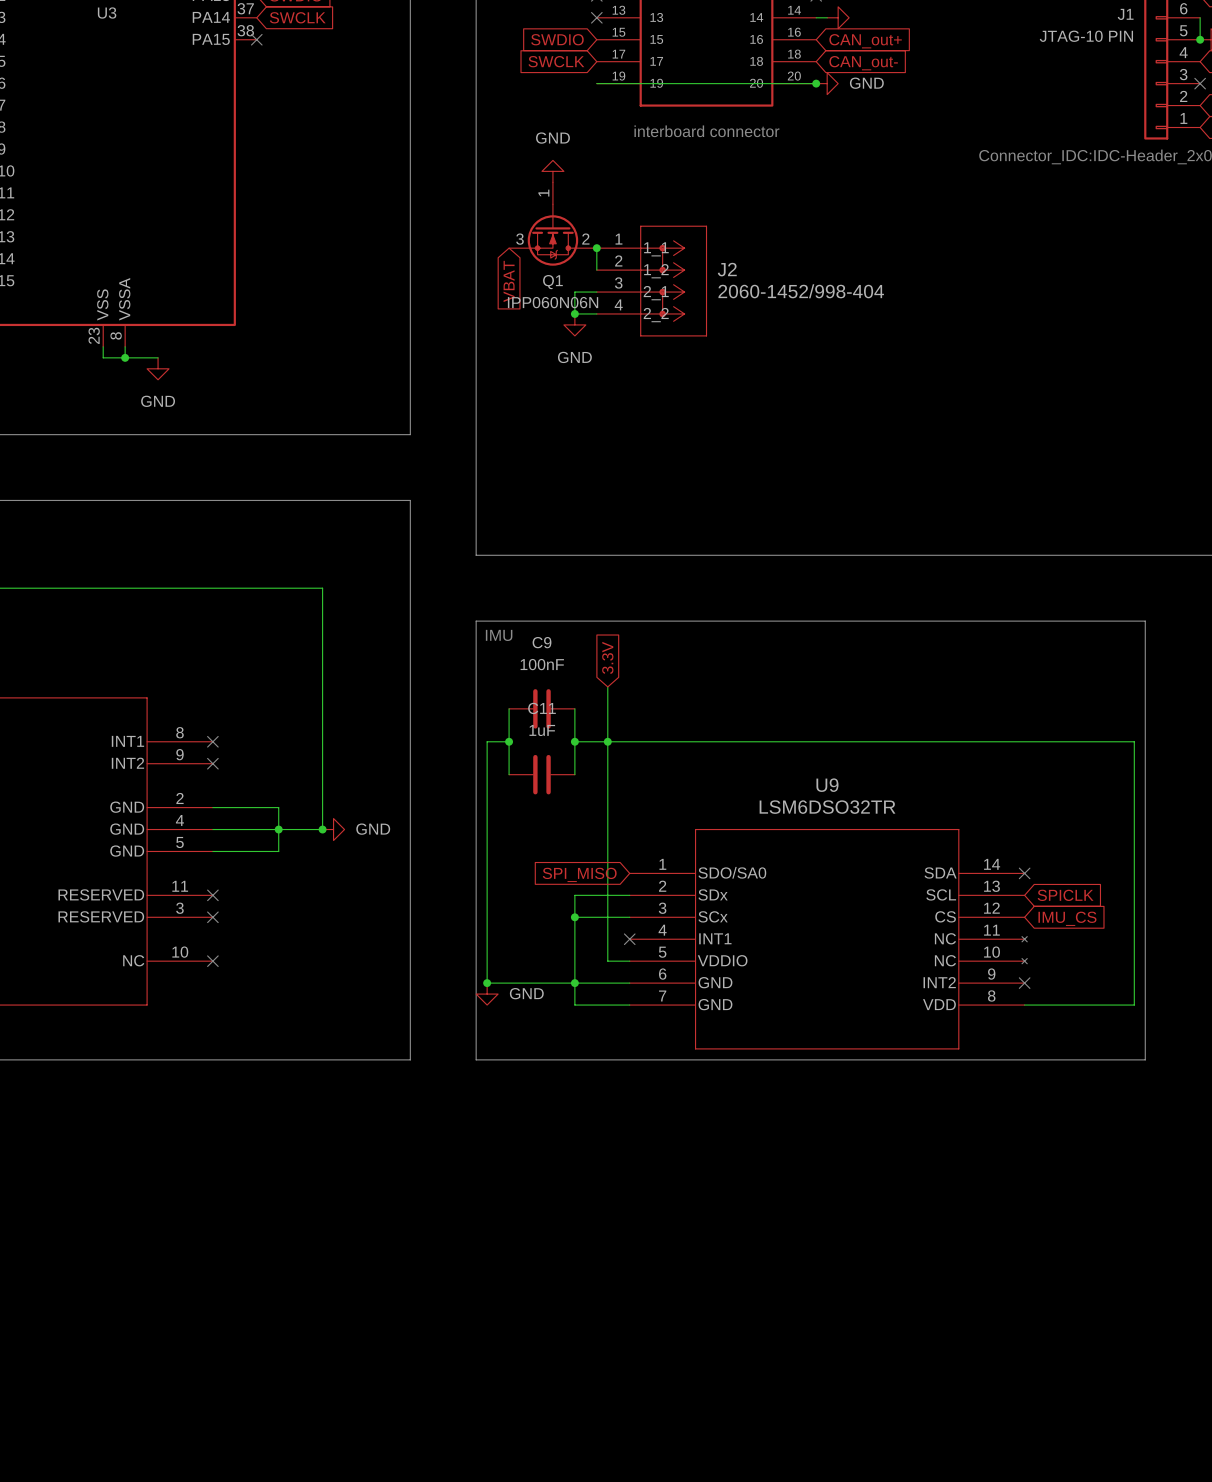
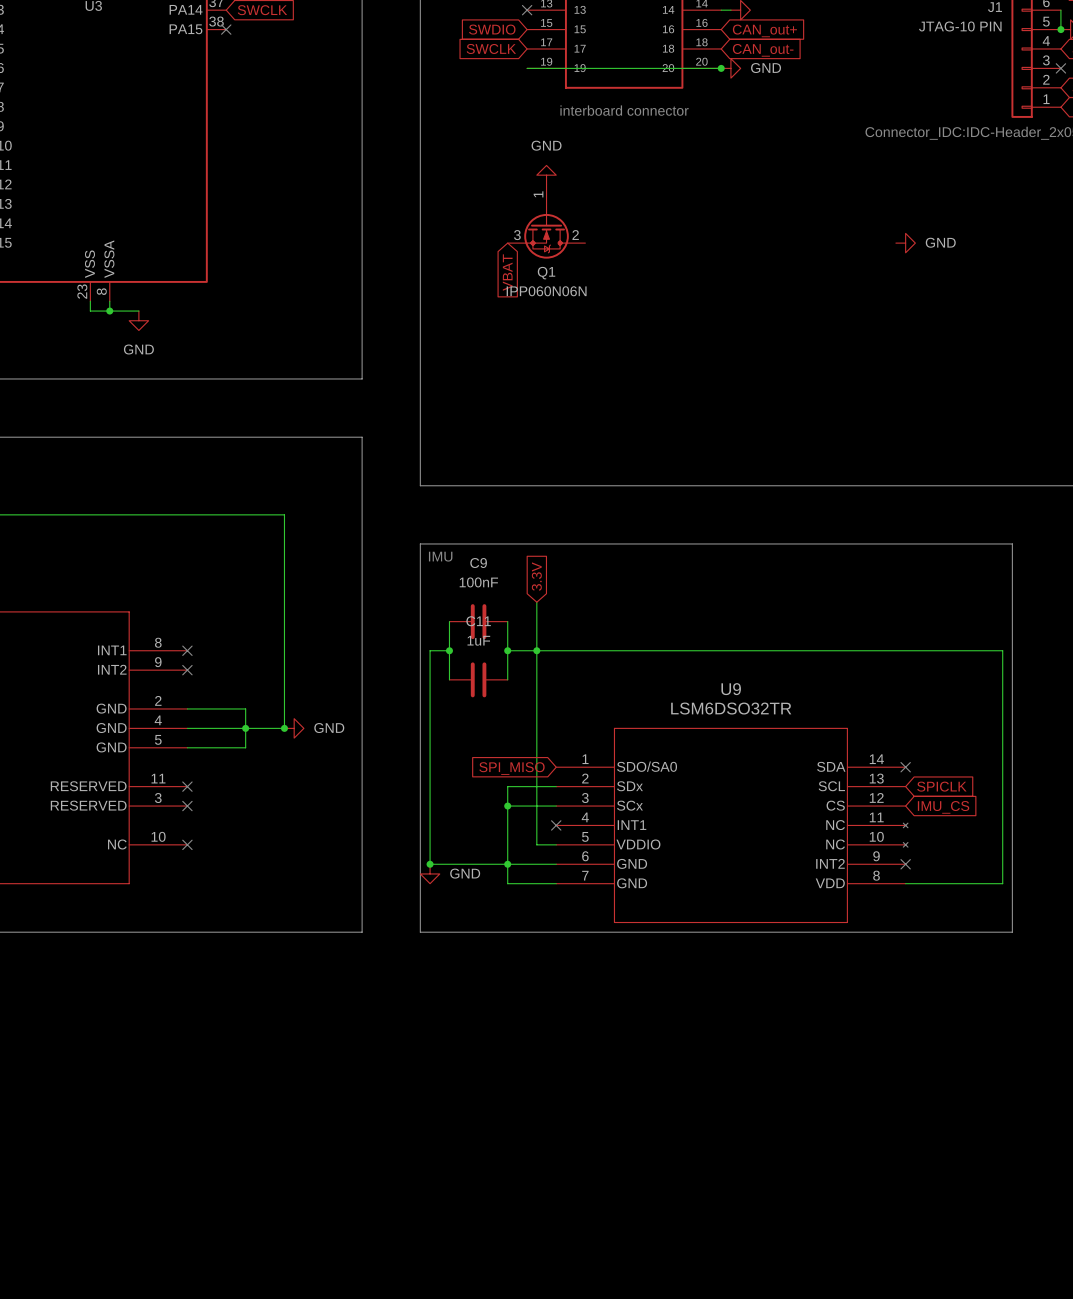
power symbol: GND (552, 171) -> none
power symbol: none -> GND (546, 175)
Q1 position: (552, 224) -> (546, 221)
wire: (596, 248) (596, 270) -> none
junction: (596, 248) -> none
global label position: VBAT (509, 281) -> VBAT (507, 272)
J2: 2060-1452/998-404 (651, 281) -> none
power symbol: none -> GND (905, 243)
wire: (596, 292) (574, 292) (574, 313) (596, 313) -> none
junction: (574, 313) -> none
power symbol: GND (574, 324) -> none

